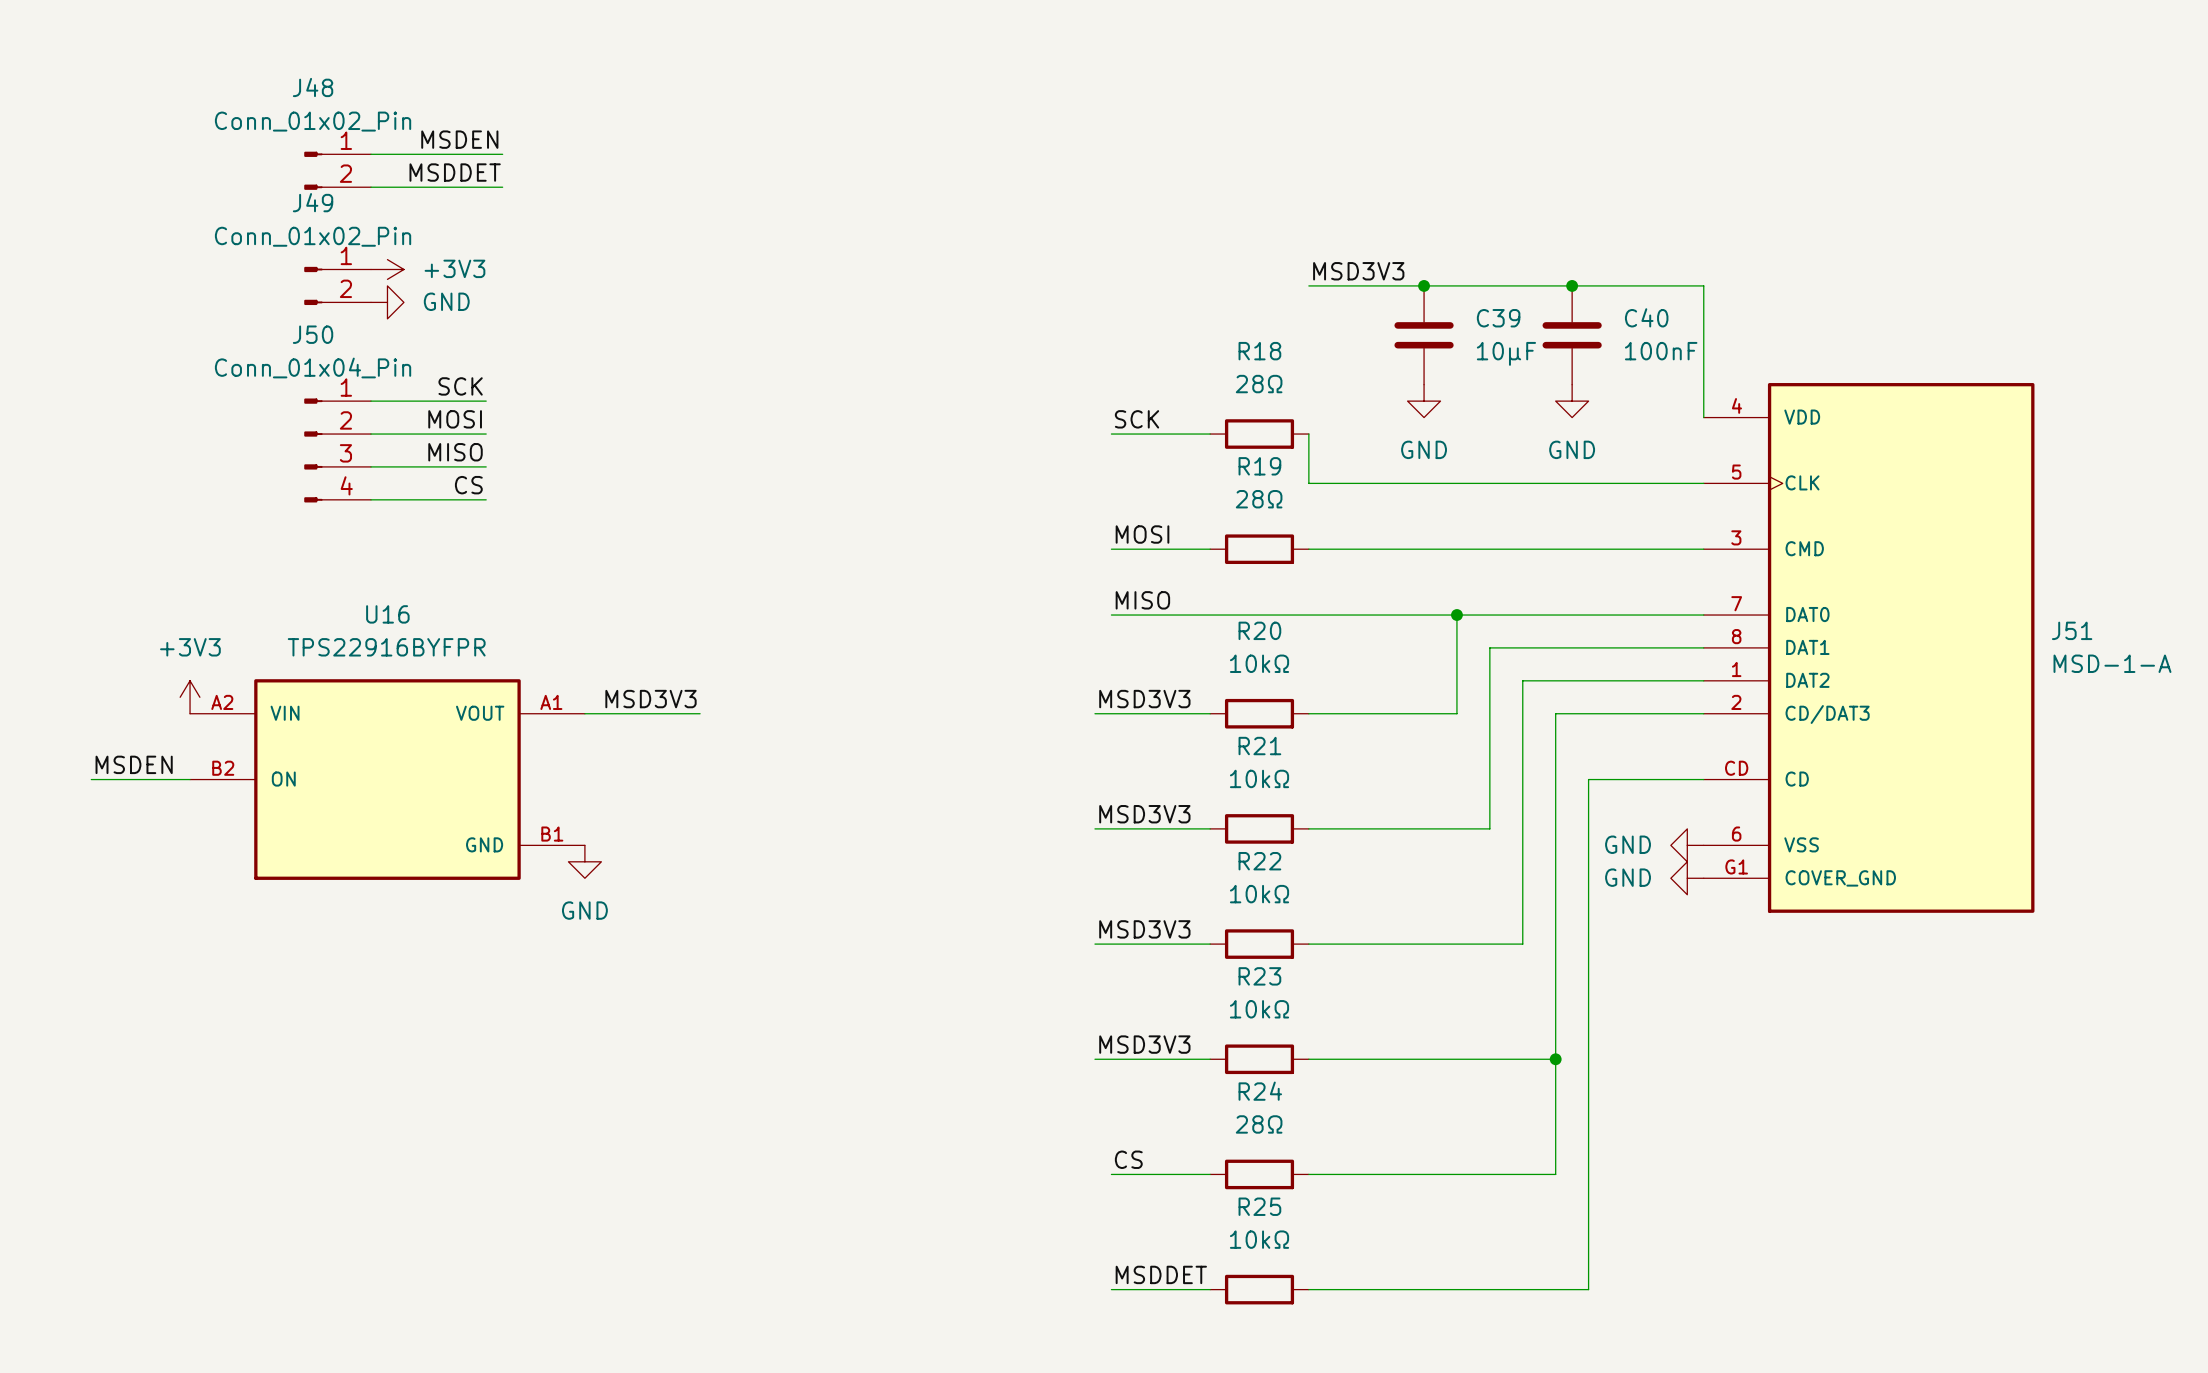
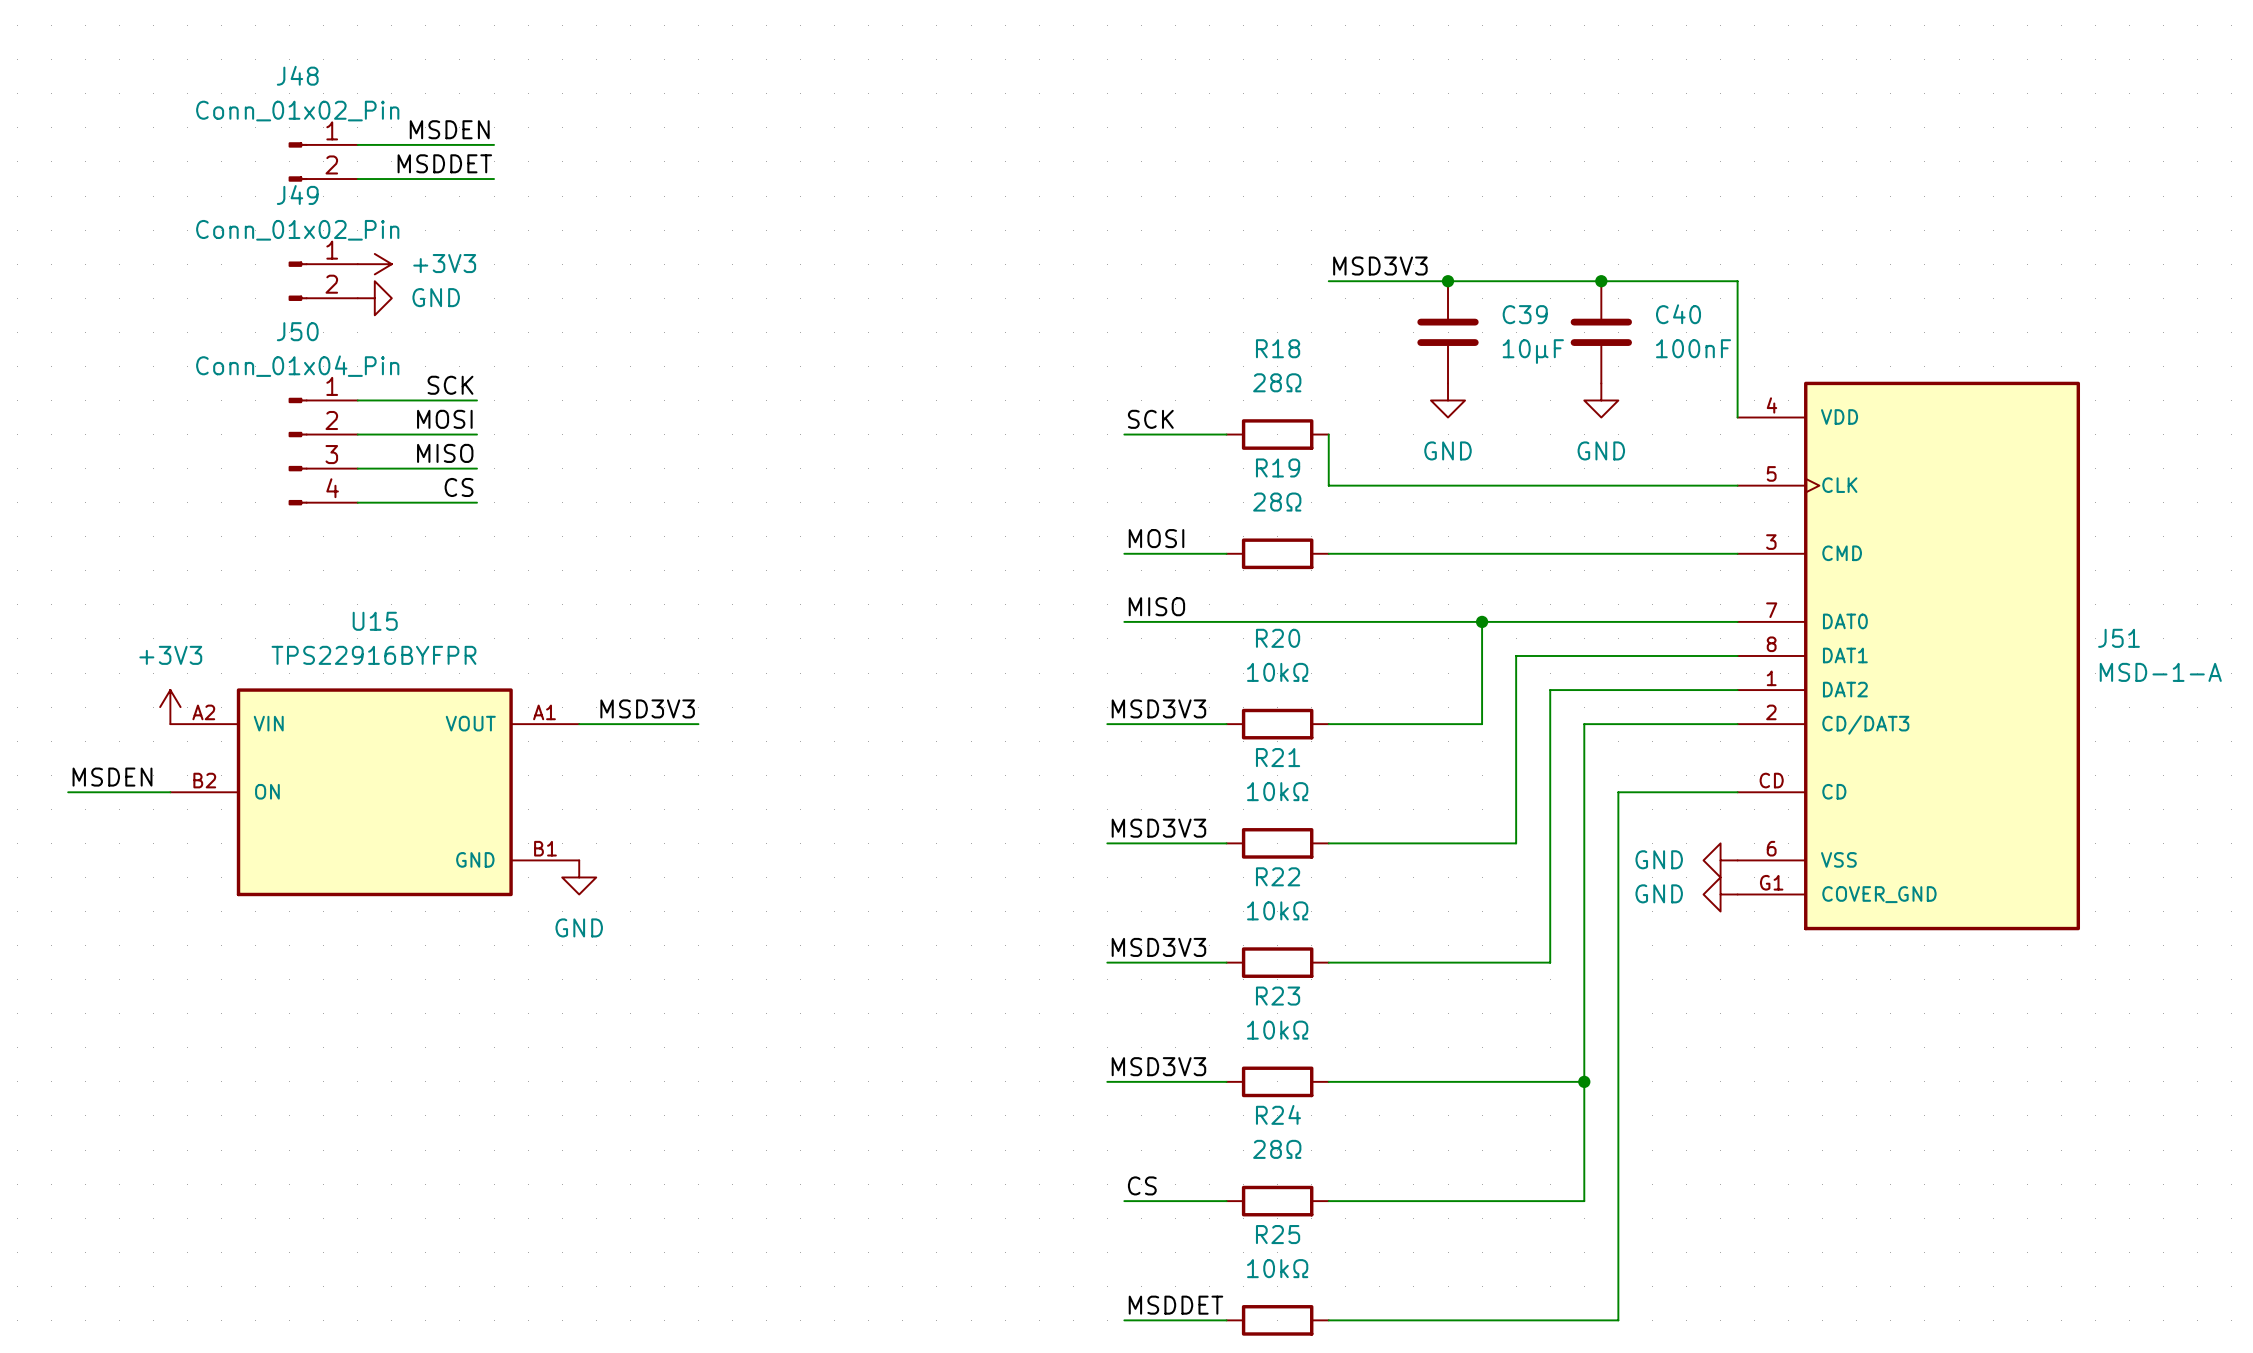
U16 name: U16 (387, 614) -> U15 (375, 621)

